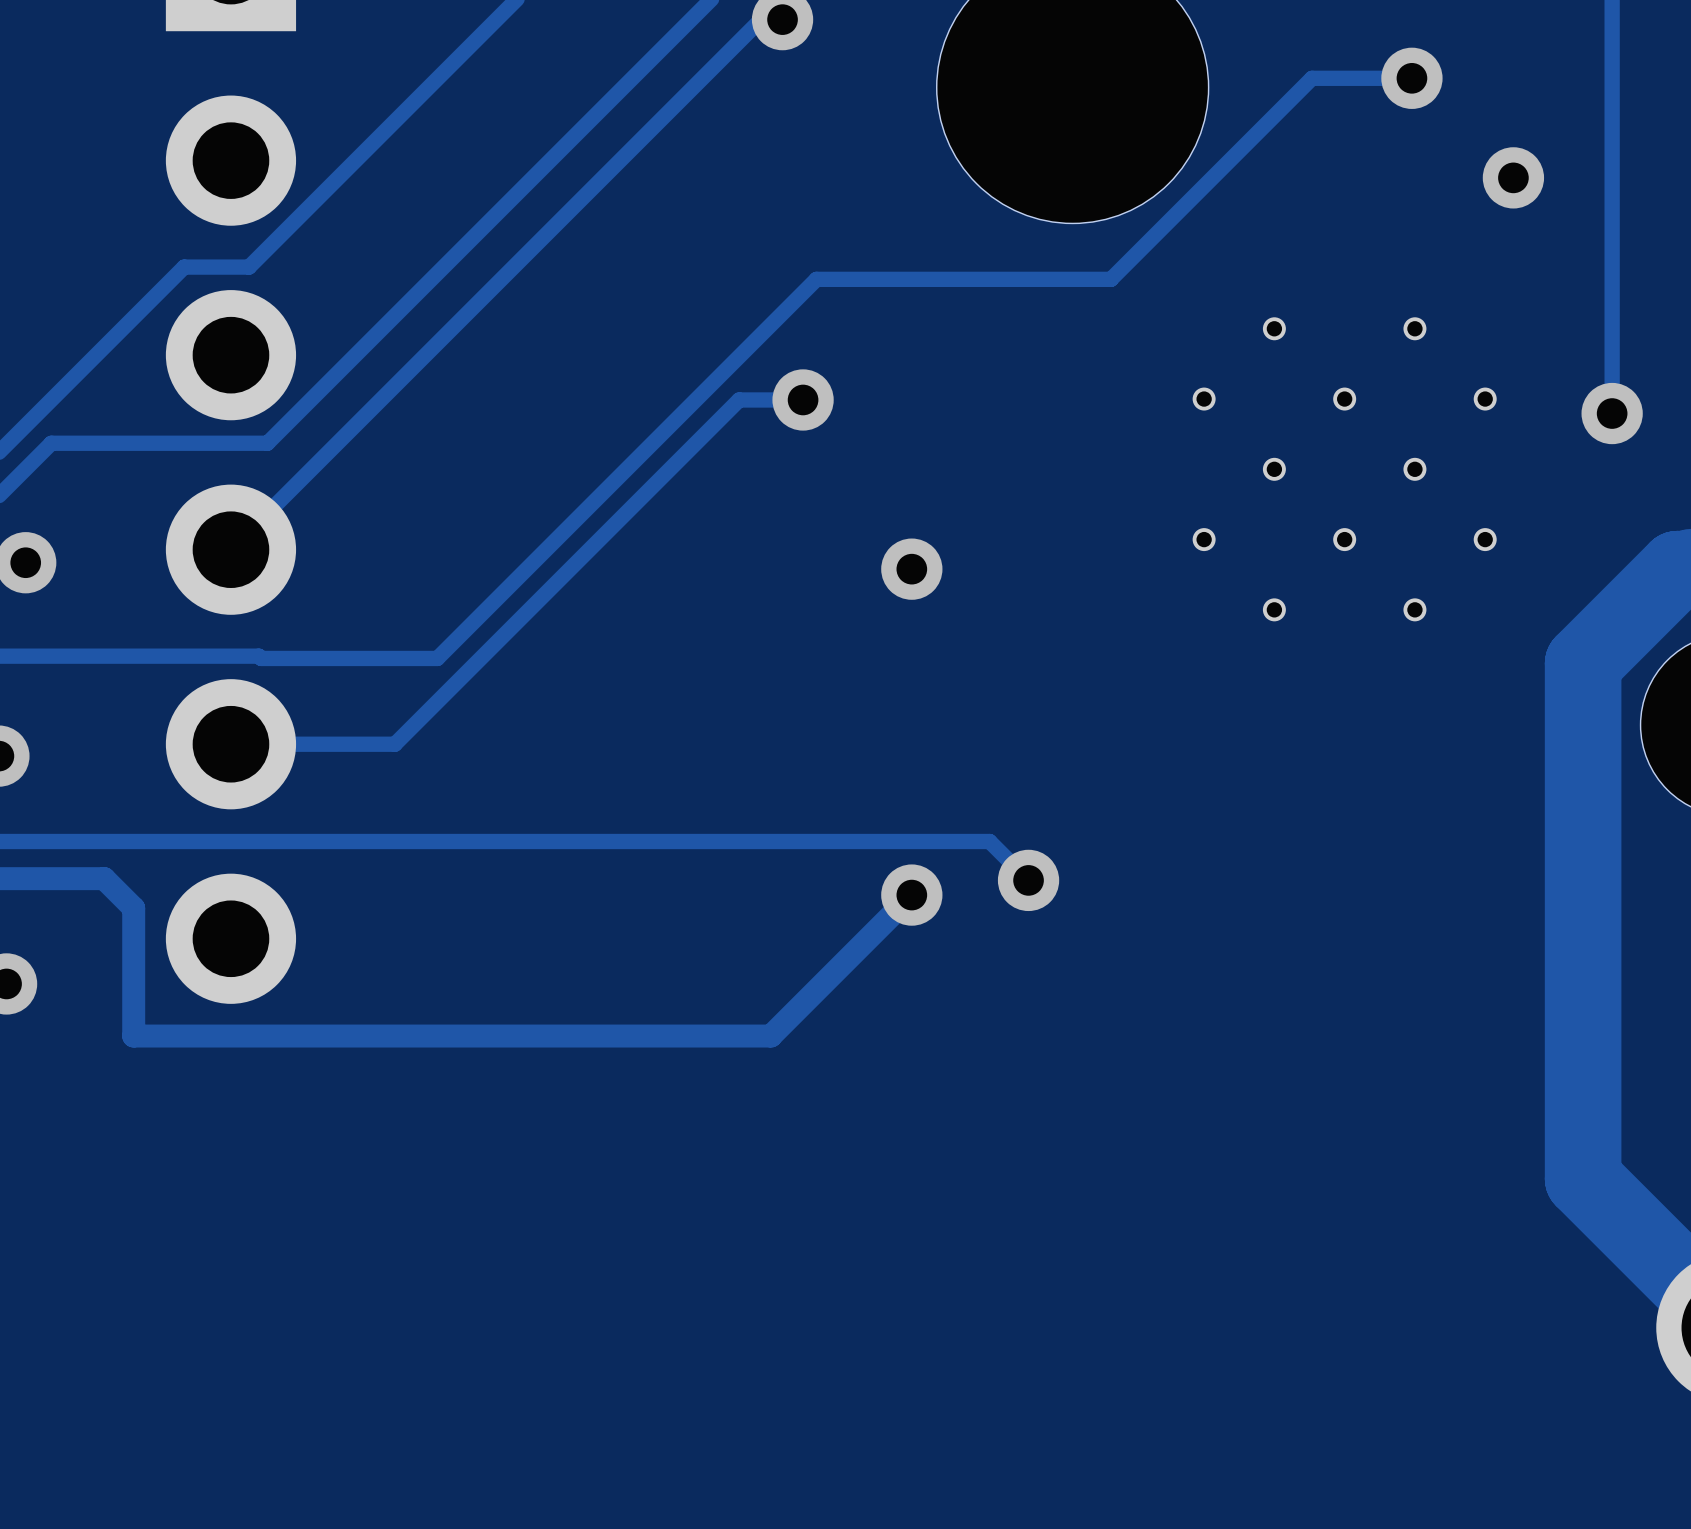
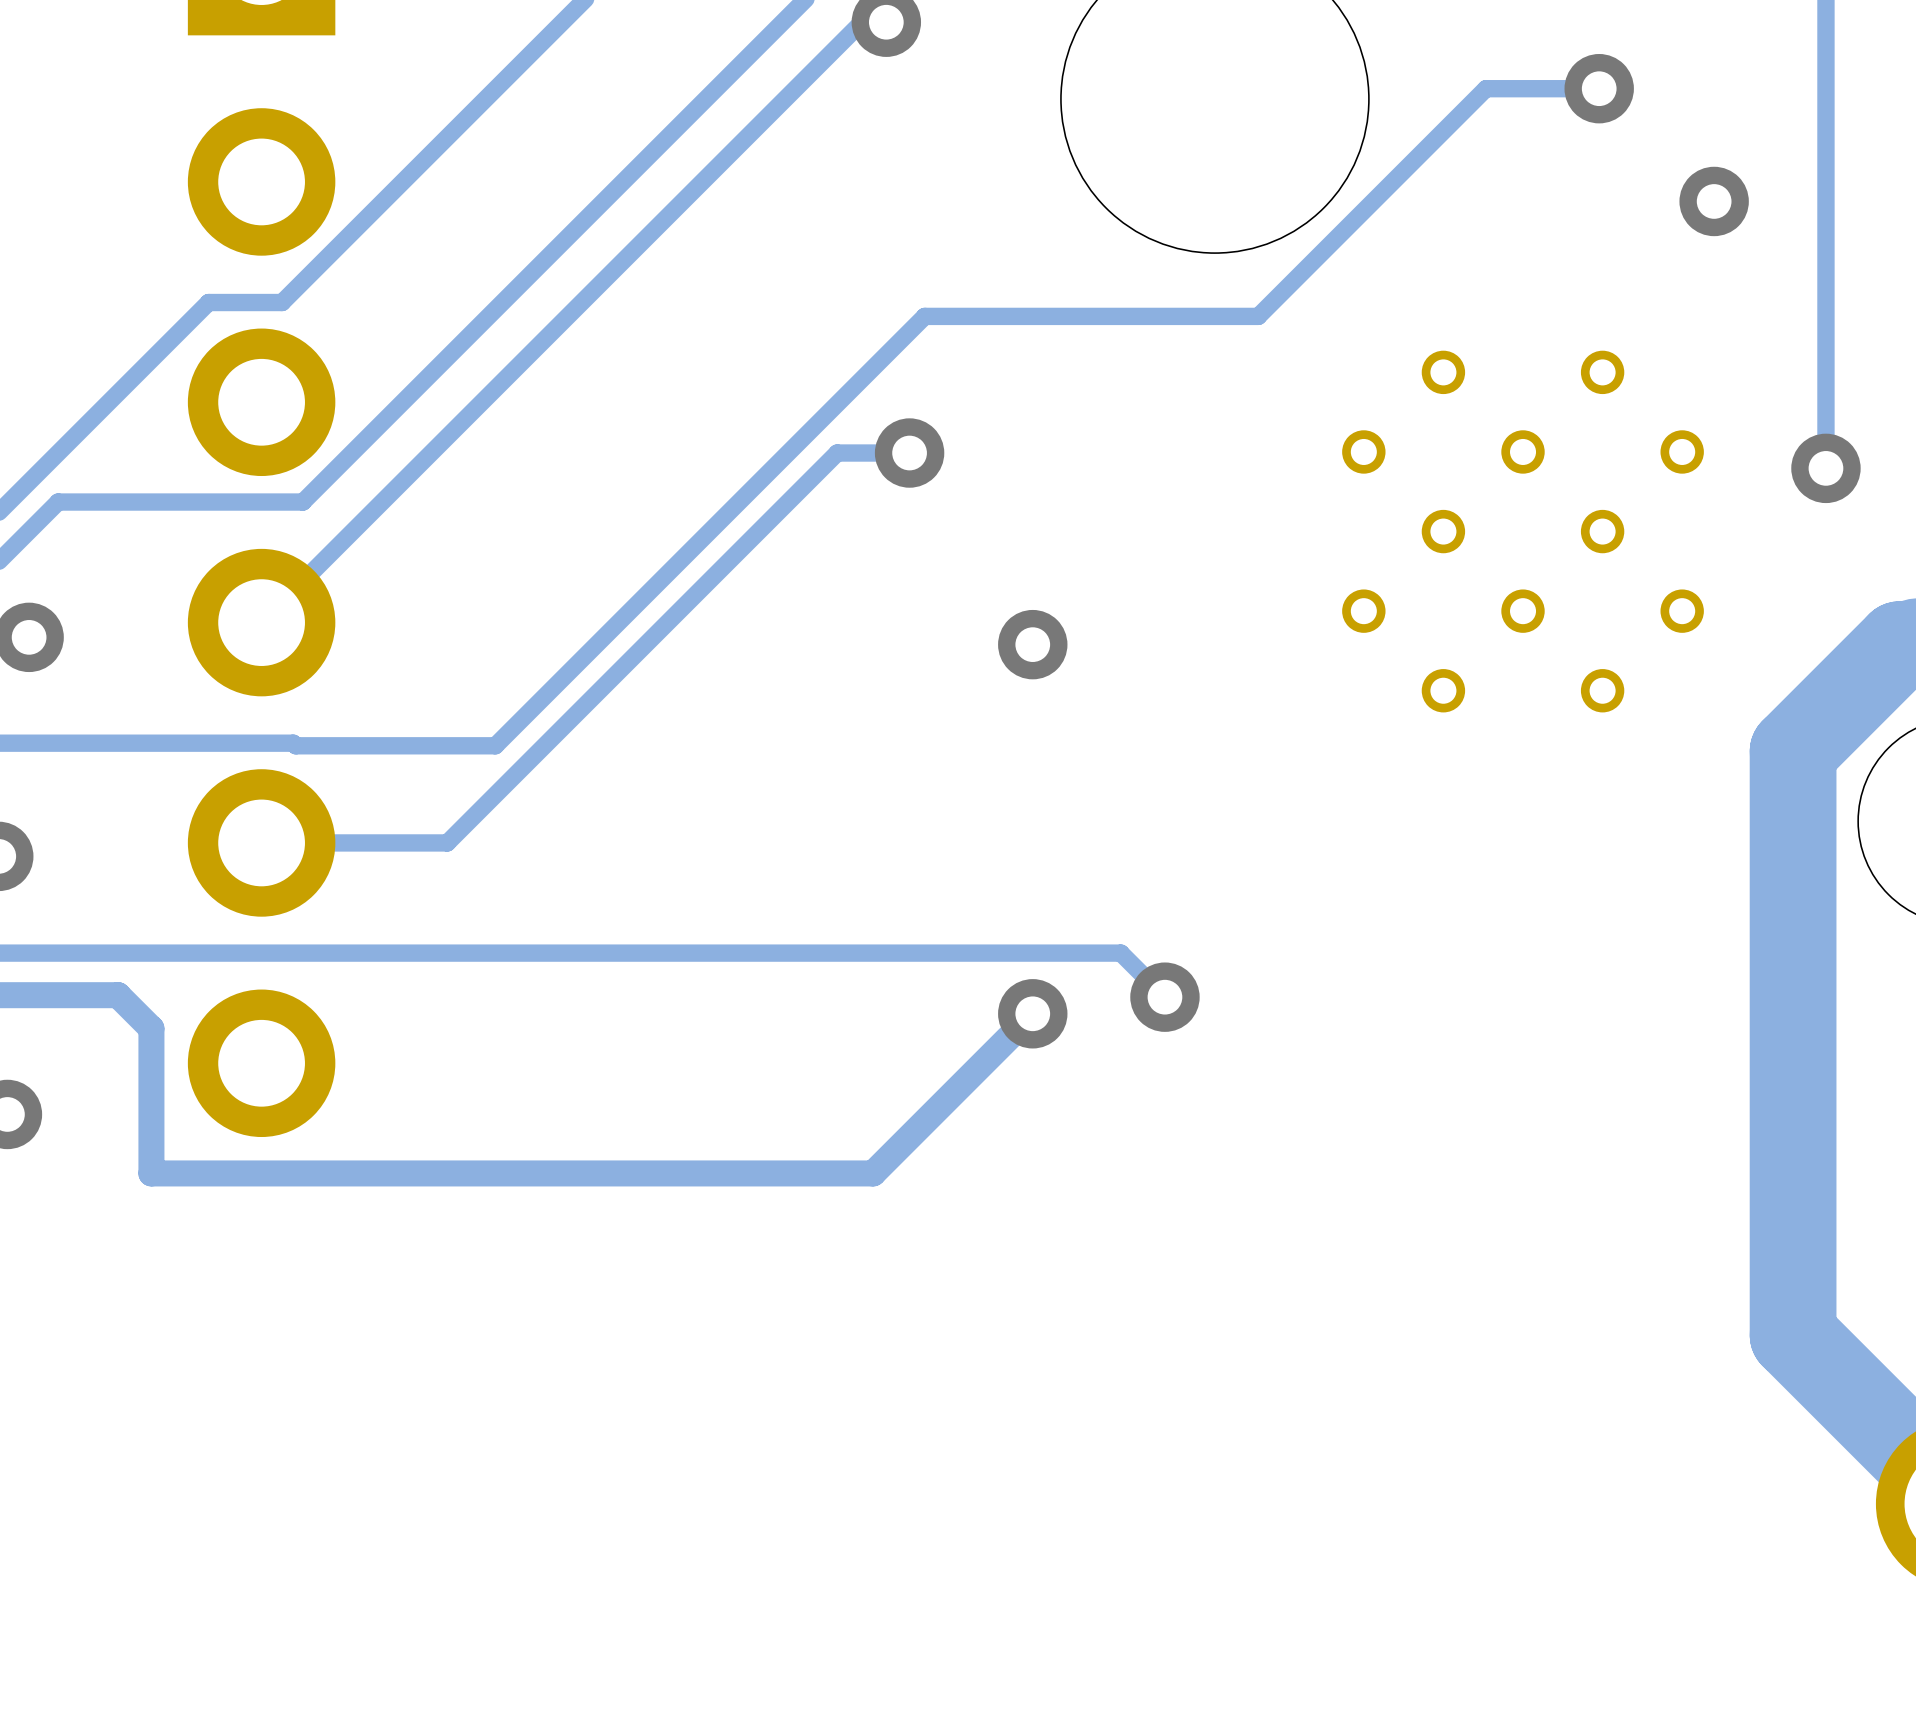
part footprint: [1192, 317, 1497, 622] -> [1342, 350, 1704, 713]

